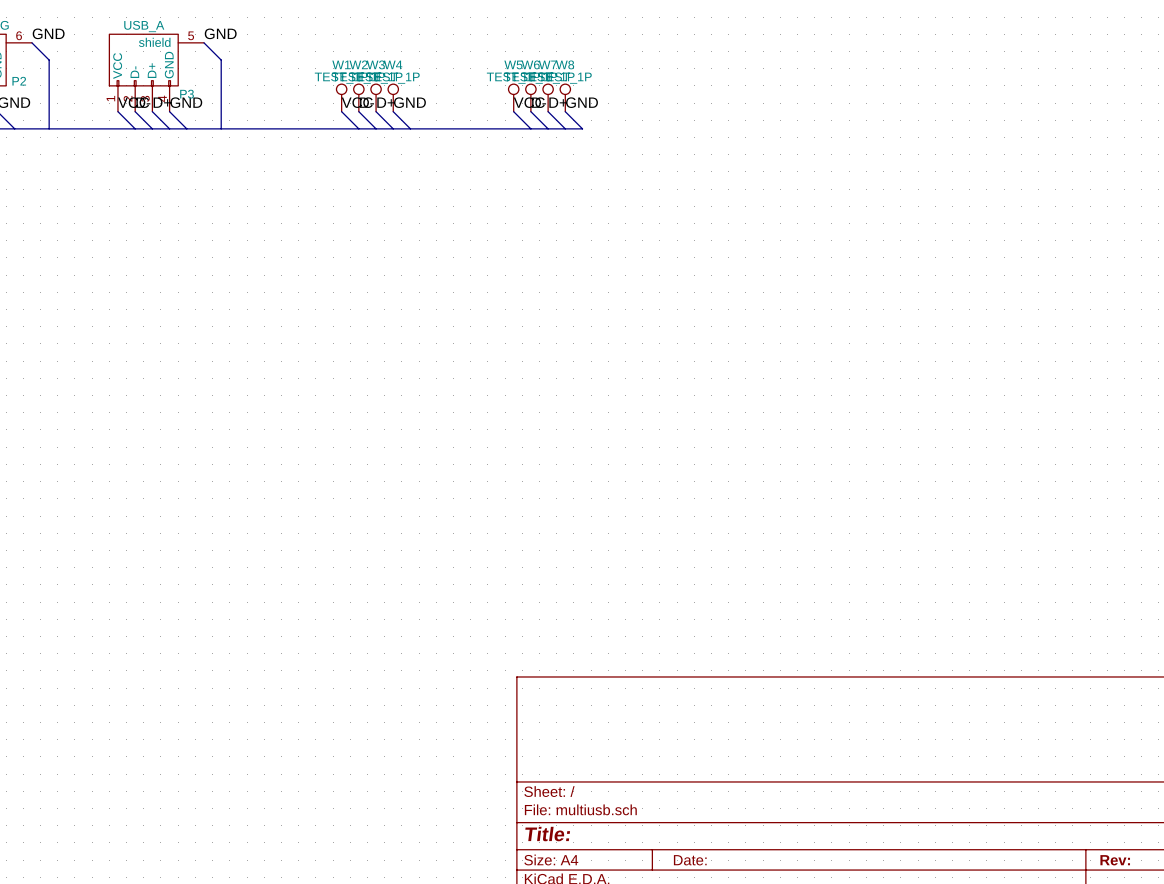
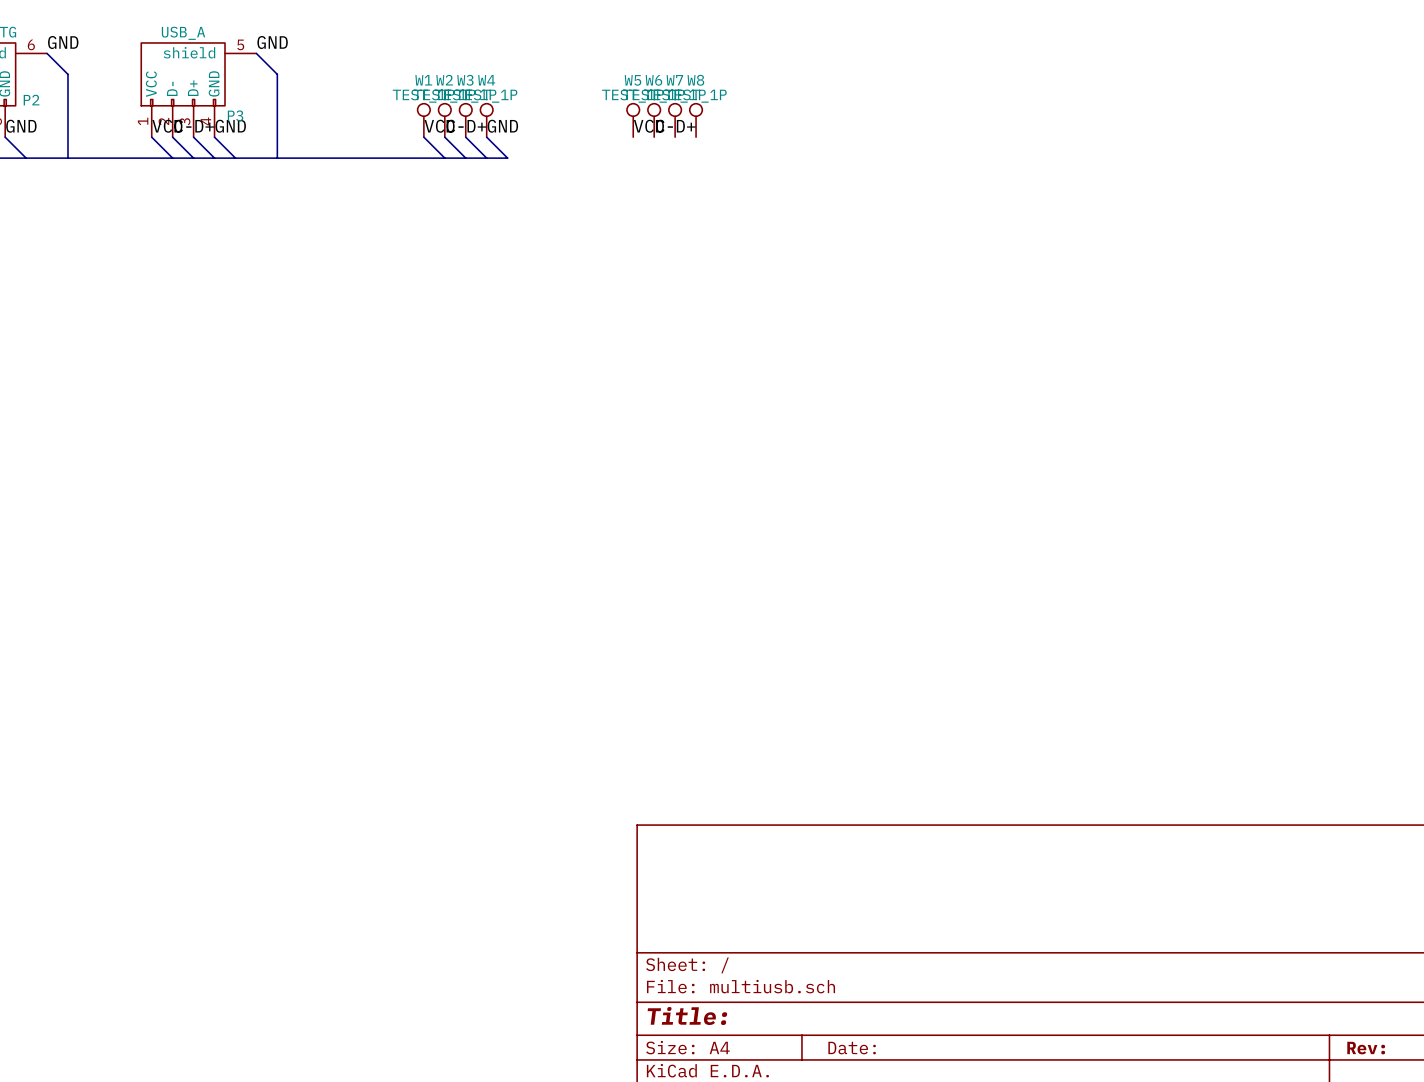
label: GND (582, 102) -> none
bus: (513, 111) (530, 128) -> none
bus: (530, 111) (548, 128) -> none
bus: (548, 111) (565, 128) -> none
bus: (565, 111) (582, 128) (410, 128) -> none

